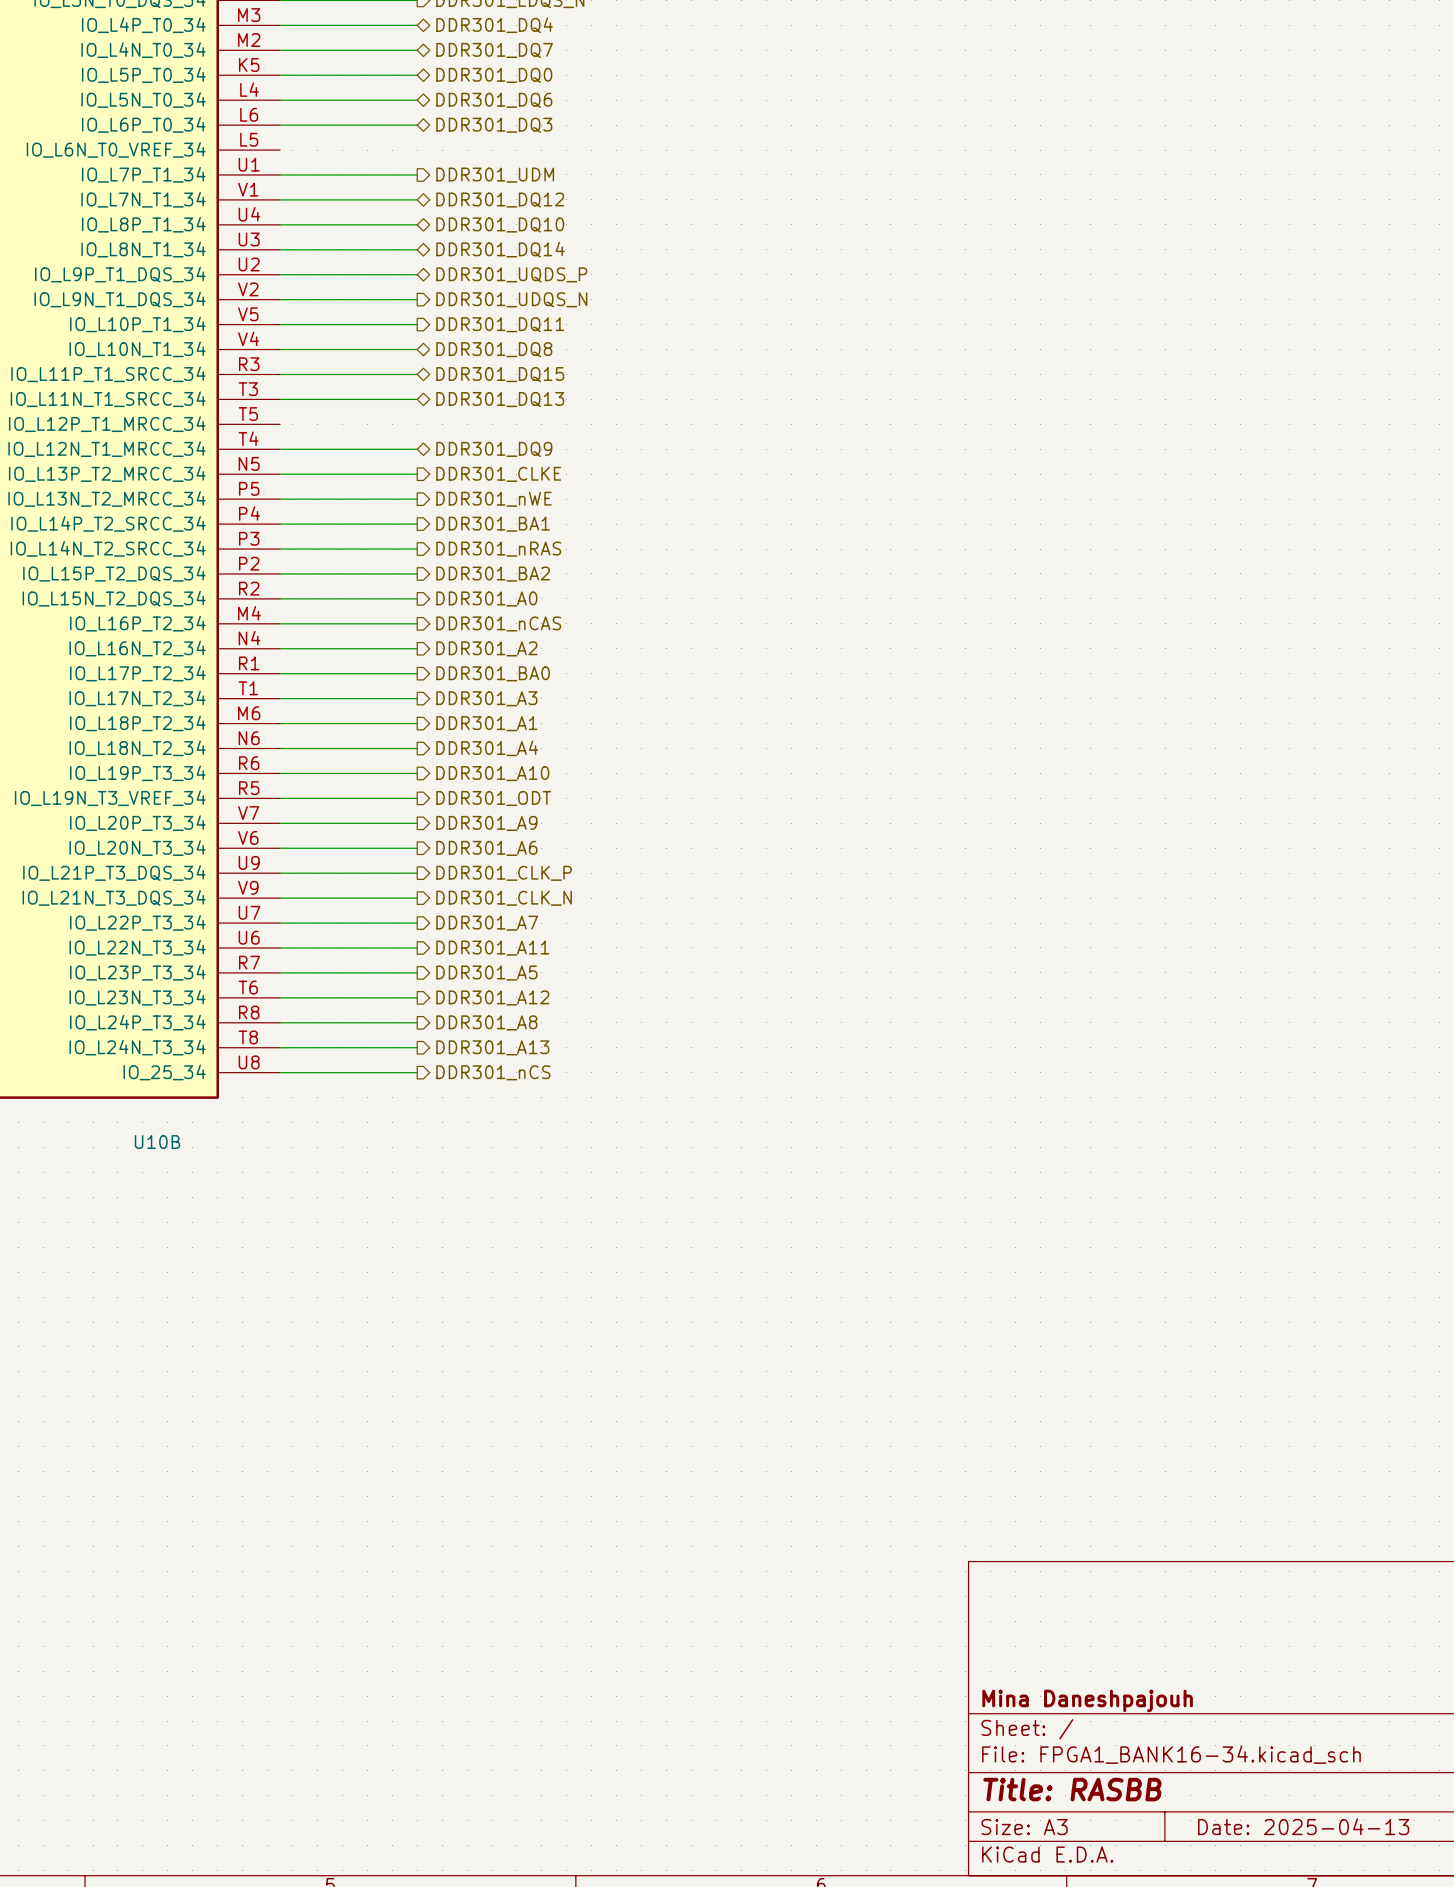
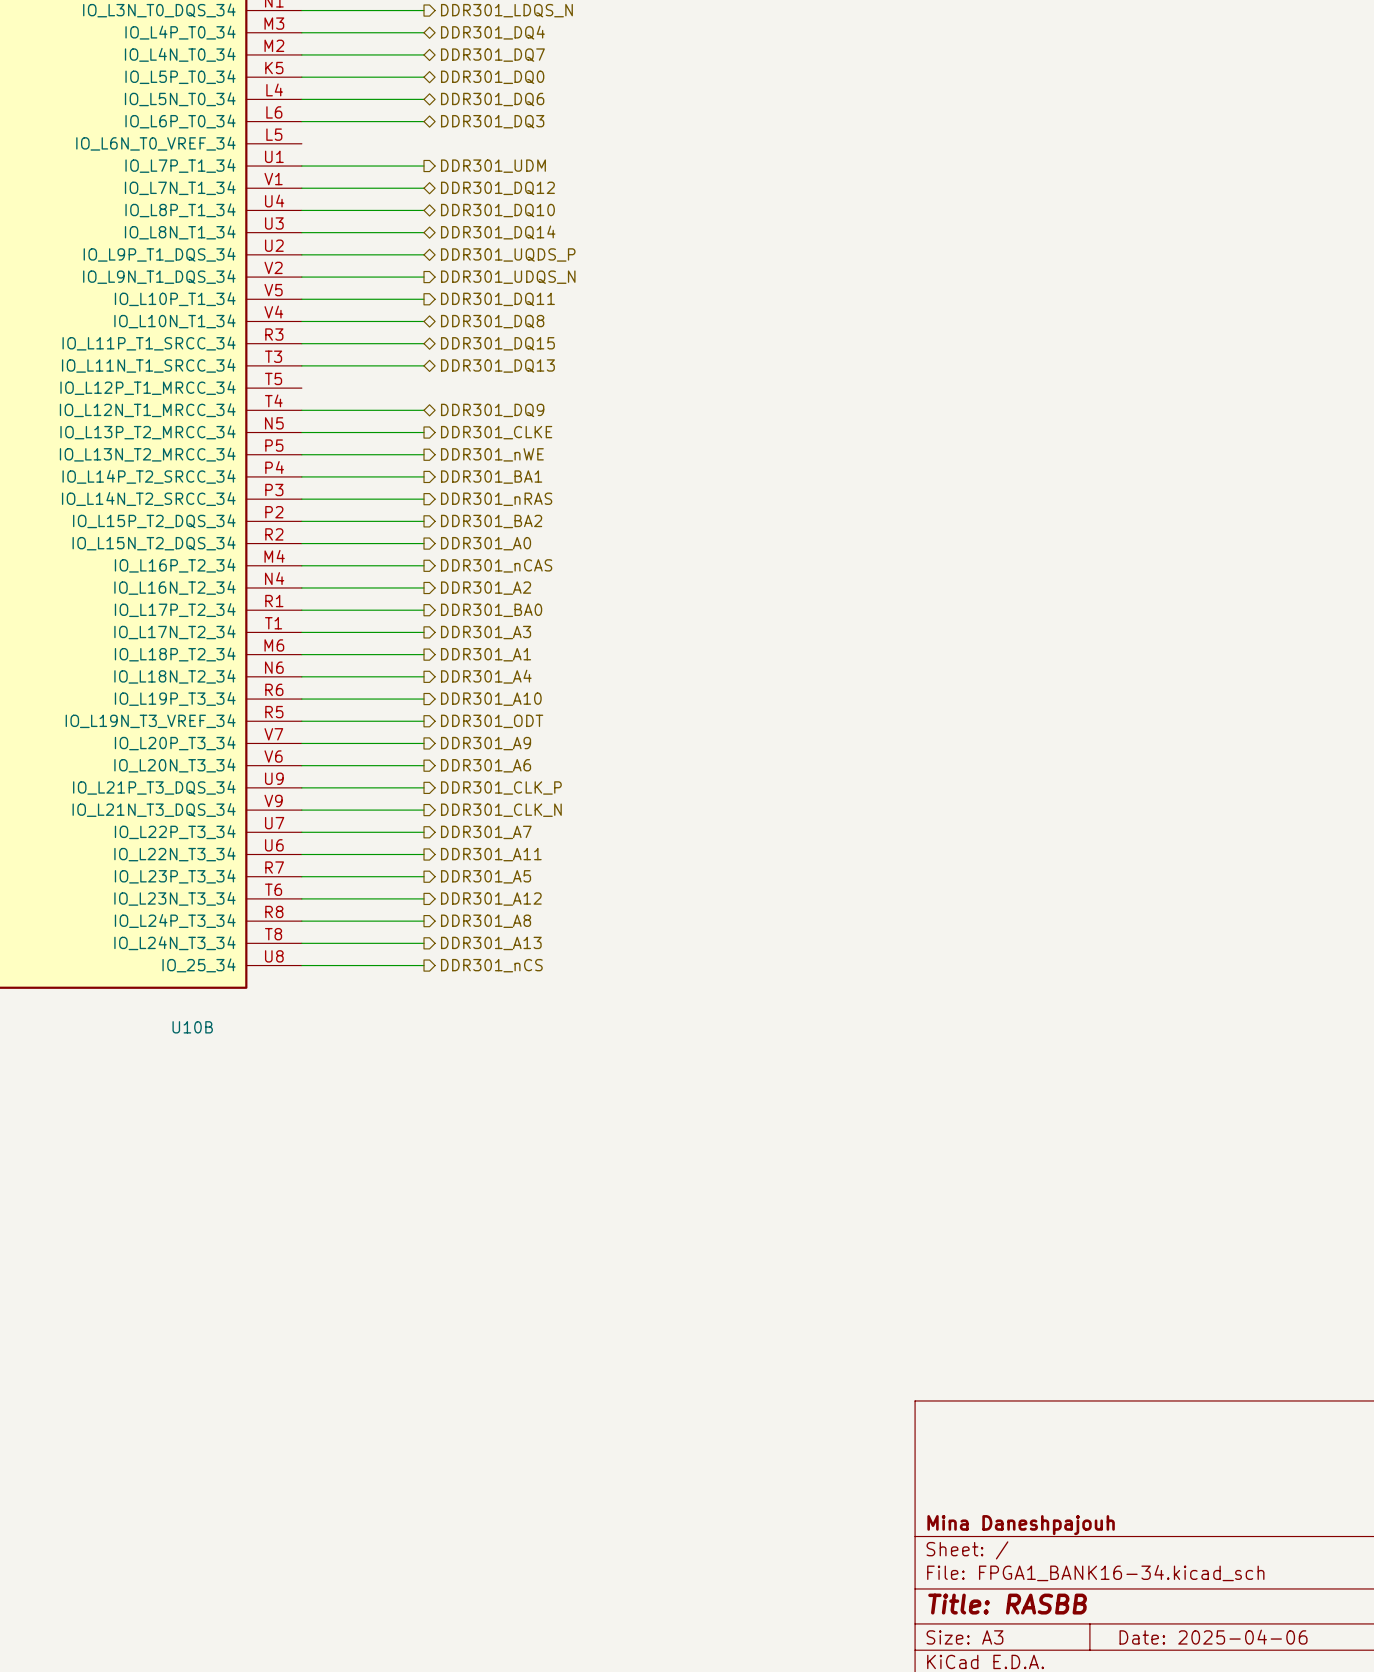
title block: Date: 2025-04-13 (1303, 1826) -> Date: 2025-04-06 (1213, 1637)

